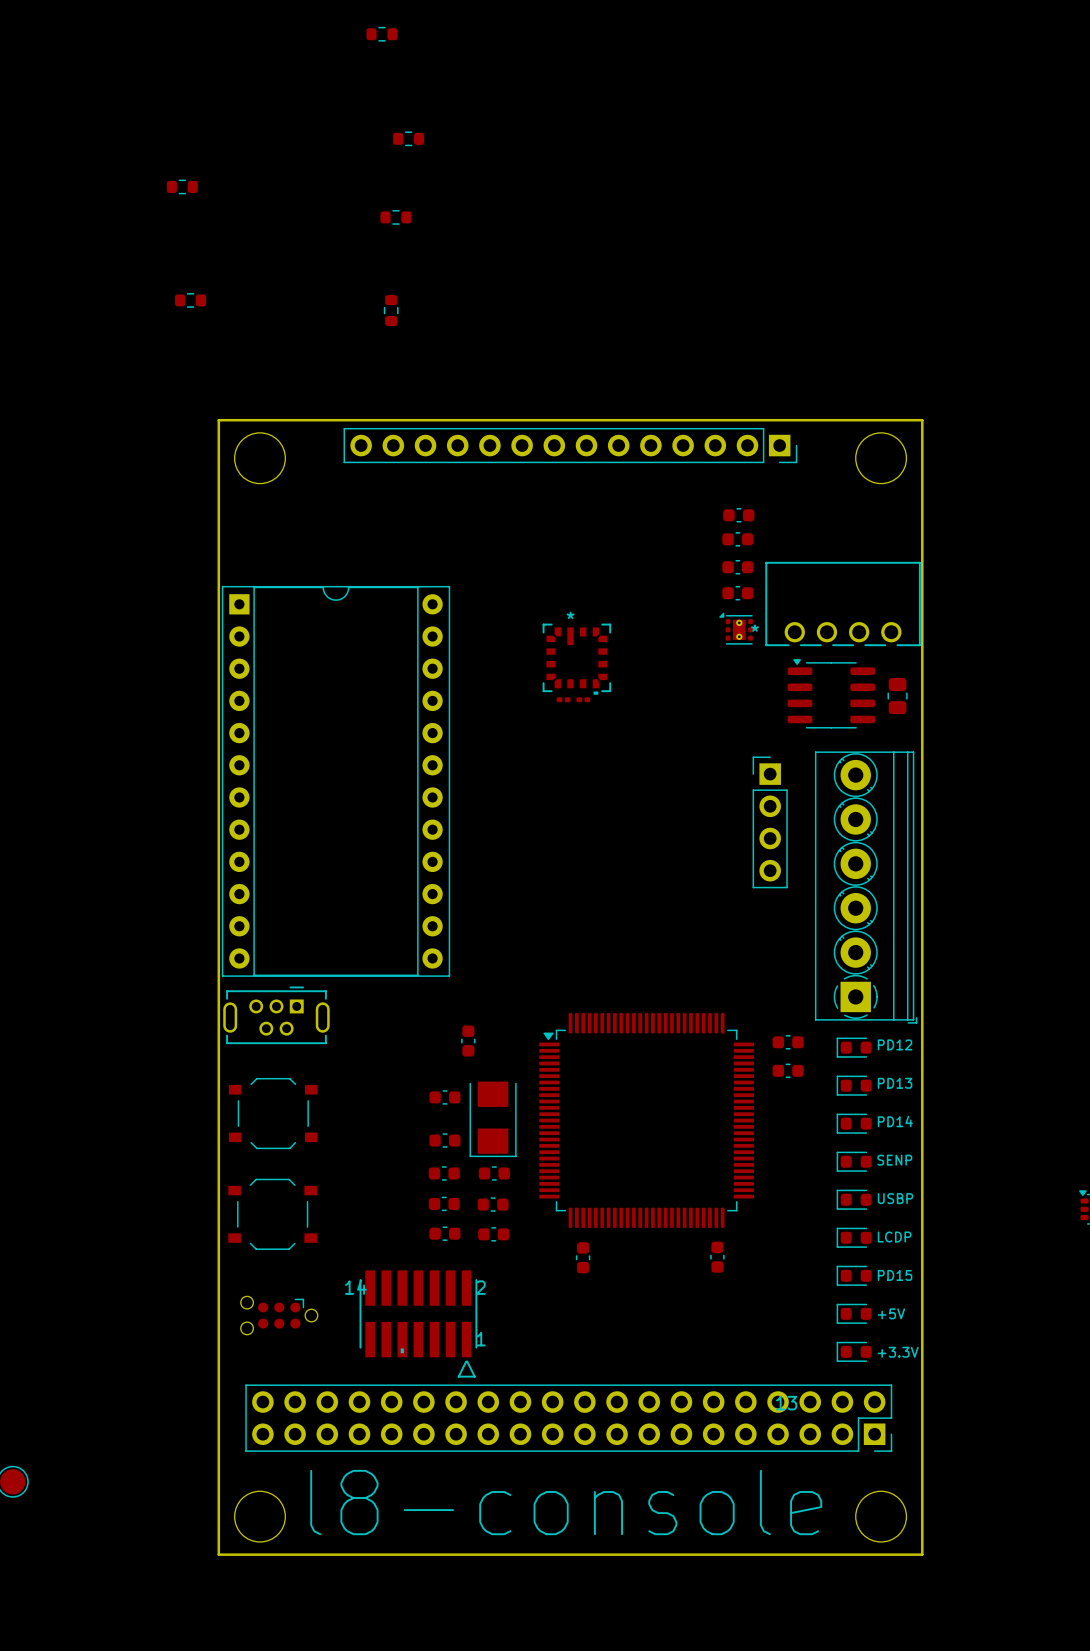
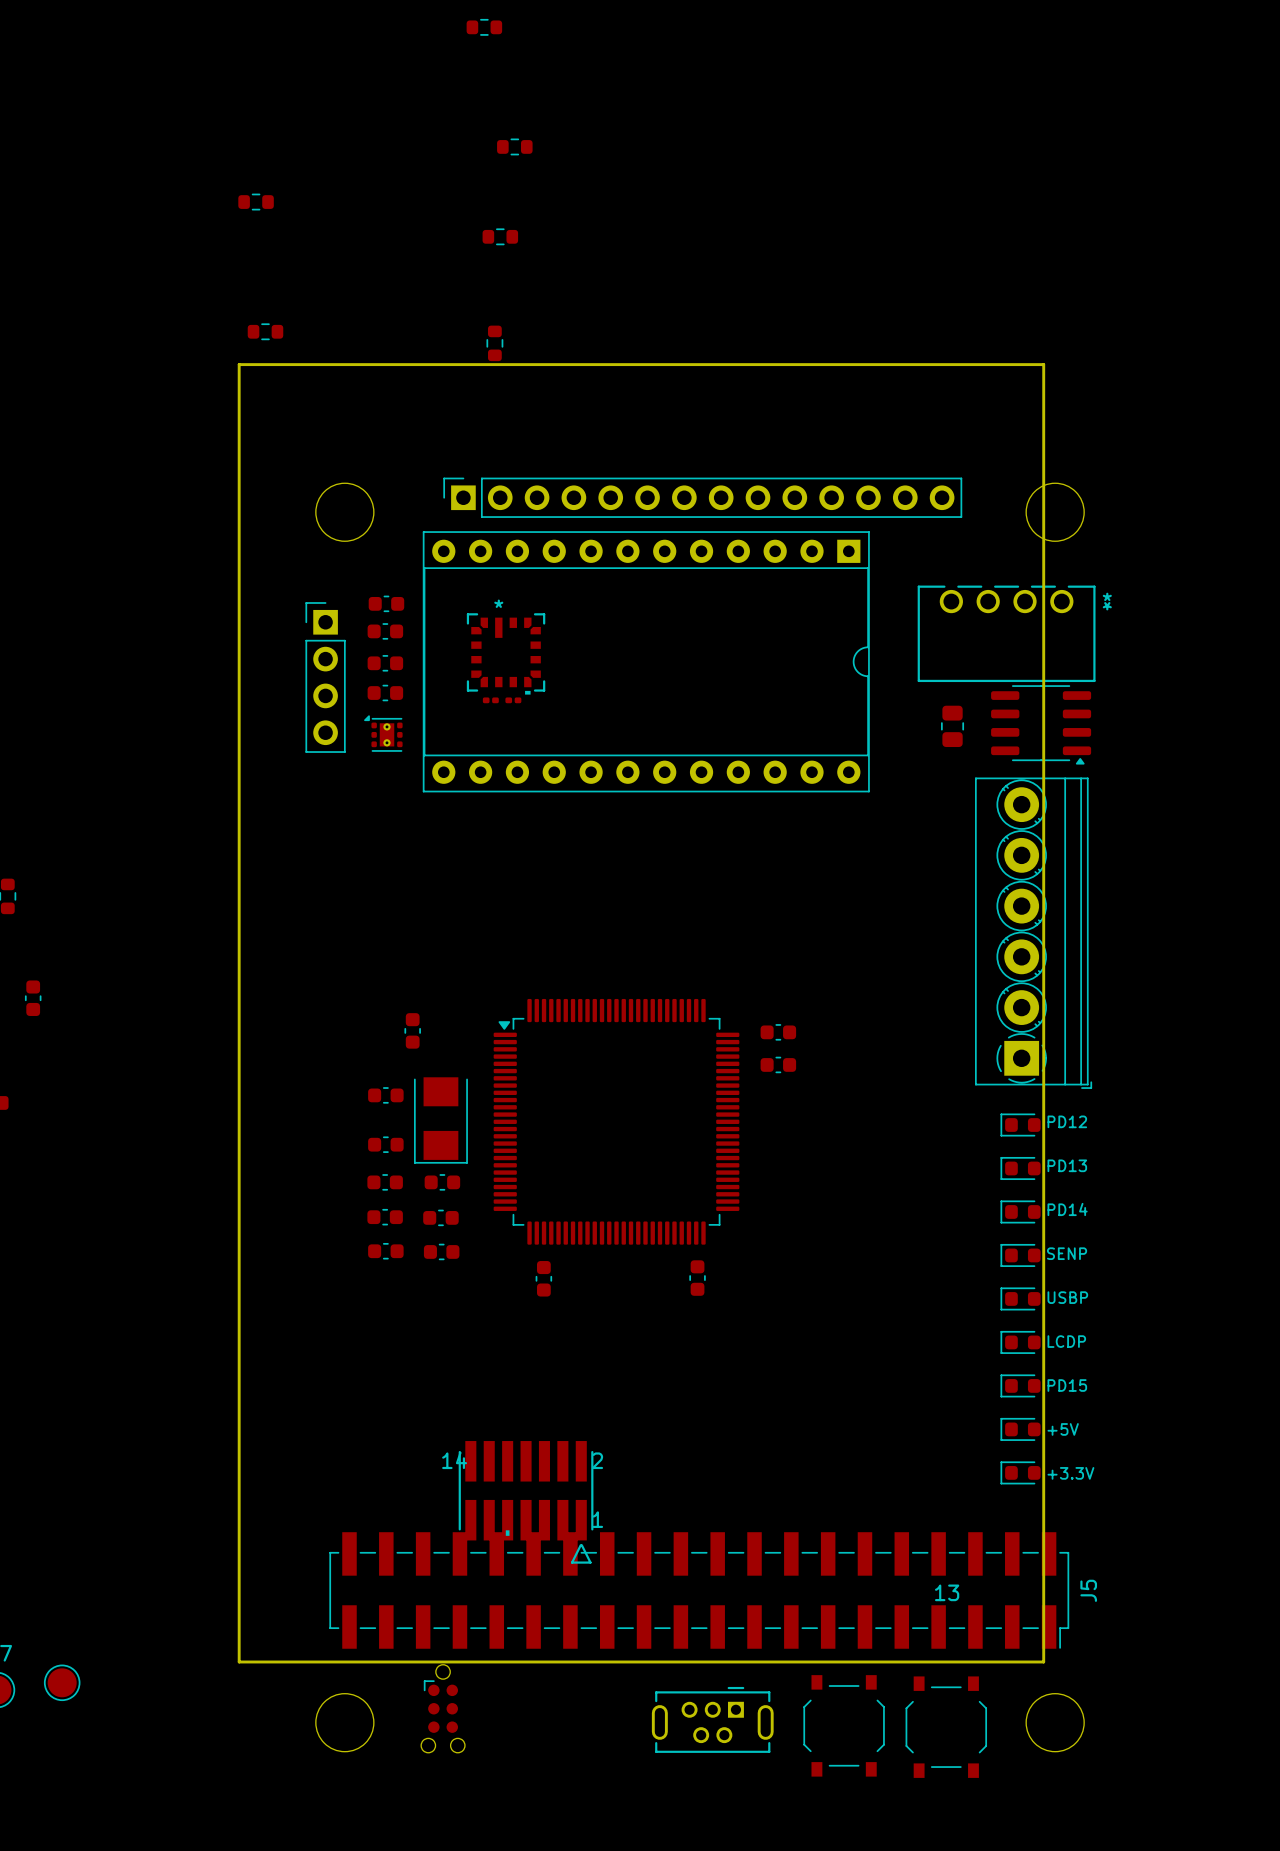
board edge: (218, 420) (922, 420) (922, 1554) (218, 1554) (218, 420) -> (239, 364) (1043, 364) (1043, 1661) (239, 1661) (239, 364)
part rotation: 0° (570, 445) -> 180° (702, 497)
part: (738, 515) -> none
part: none -> (386, 603)
part: (737, 539) -> none
part: none -> (385, 631)
part: (737, 567) -> none
part: none -> (385, 663)
part: (737, 593) -> none
part: none -> (325, 677)
part rotation: 0° (843, 604) -> 180° (1006, 633)
part: none -> (385, 693)
part: none -> (490, 700)
part: none -> (513, 700)
part: (736, 628) -> none
part: none -> (383, 733)
part position: (576, 659) -> (506, 653)
part rotation: 0° (831, 693) -> 180° (1041, 724)
part position: (831, 693) -> (1041, 724)
part position: (897, 696) -> (952, 726)
part: (563, 699) -> none
part: (583, 699) -> none
part rotation: 0° (335, 781) -> 90° clockwise (646, 661)
part position: (335, 781) -> (646, 661)
part: (770, 822) -> none
part position: (866, 887) -> (1033, 933)
part: none -> (412, 1030)
part: none -> (778, 1032)
part: none -> (778, 1064)
part: none -> (385, 1095)
part: none -> (1020, 1125)
part: none -> (385, 1144)
part: (276, 1015) -> none
part: none -> (1020, 1168)
part: (468, 1041) -> none
part: (788, 1042) -> none
part: none -> (385, 1182)
part: none -> (442, 1182)
text position: PD12 (895, 1044) -> PD12 (1067, 1121)
part: (854, 1047) -> none
part: (788, 1070) -> none
part: none -> (1020, 1211)
part: none -> (385, 1217)
part: none -> (440, 1217)
text position: PD13 (895, 1083) -> PD13 (1067, 1165)
part: (854, 1085) -> none
part: (444, 1097) -> none
part: none -> (385, 1251)
part: none -> (441, 1251)
part: none -> (1020, 1255)
part: (273, 1113) -> none
part position: (493, 1119) -> (440, 1120)
part position: (646, 1120) -> (616, 1121)
text position: PD14 (895, 1121) -> PD14 (1067, 1209)
part: (854, 1123) -> none
part: none -> (697, 1278)
part rotation: 0° (444, 1140) -> 90° clockwise (543, 1278)
part: none -> (1020, 1298)
text position: SENP (894, 1160) -> SENP (1067, 1253)
part: (854, 1161) -> none
part: (444, 1173) -> none
part: (494, 1173) -> none
part: none -> (1020, 1342)
text position: USBP (895, 1198) -> USBP (1067, 1297)
part: (854, 1199) -> none
part: (444, 1203) -> none
part: (493, 1204) -> none
part: (272, 1214) -> none
part: none -> (1020, 1385)
part: (444, 1233) -> none
part: (493, 1234) -> none
part: (854, 1237) -> none
text position: LCDP (894, 1237) -> LCDP (1066, 1341)
part: (583, 1257) -> none
part: (717, 1257) -> none
part: none -> (1020, 1429)
part: (854, 1275) -> none
text position: PD15 (895, 1275) -> PD15 (1067, 1385)
part: none -> (1020, 1472)
part: (854, 1313) -> none
text position: +5V (891, 1313) -> +5V (1063, 1429)
part rotation: 0° (279, 1315) -> 90° counterclockwise (443, 1708)
part position: (279, 1315) -> (443, 1708)
part: (854, 1351) -> none
text position: +3.3V (898, 1352) -> +3.3V (1070, 1473)
J5: none -> (699, 1590)
part: (568, 1418) -> none
text: l8-console (566, 1502) -> none
part: none -> (712, 1719)
part: none -> (844, 1725)
part: none -> (946, 1727)

